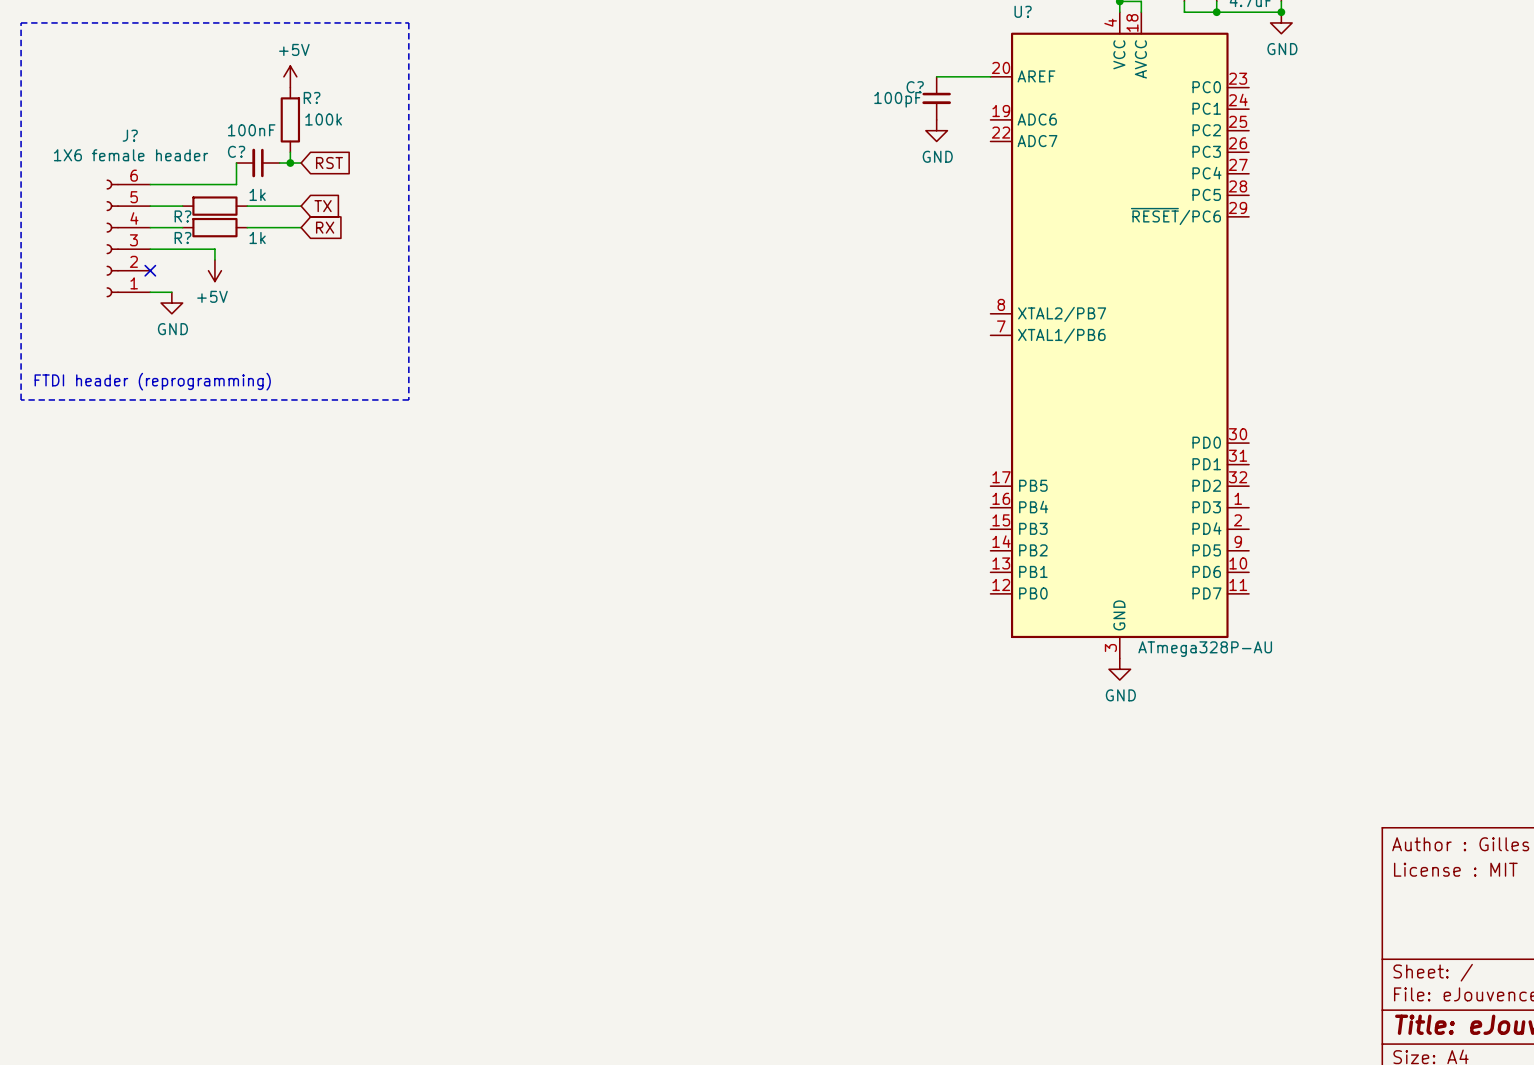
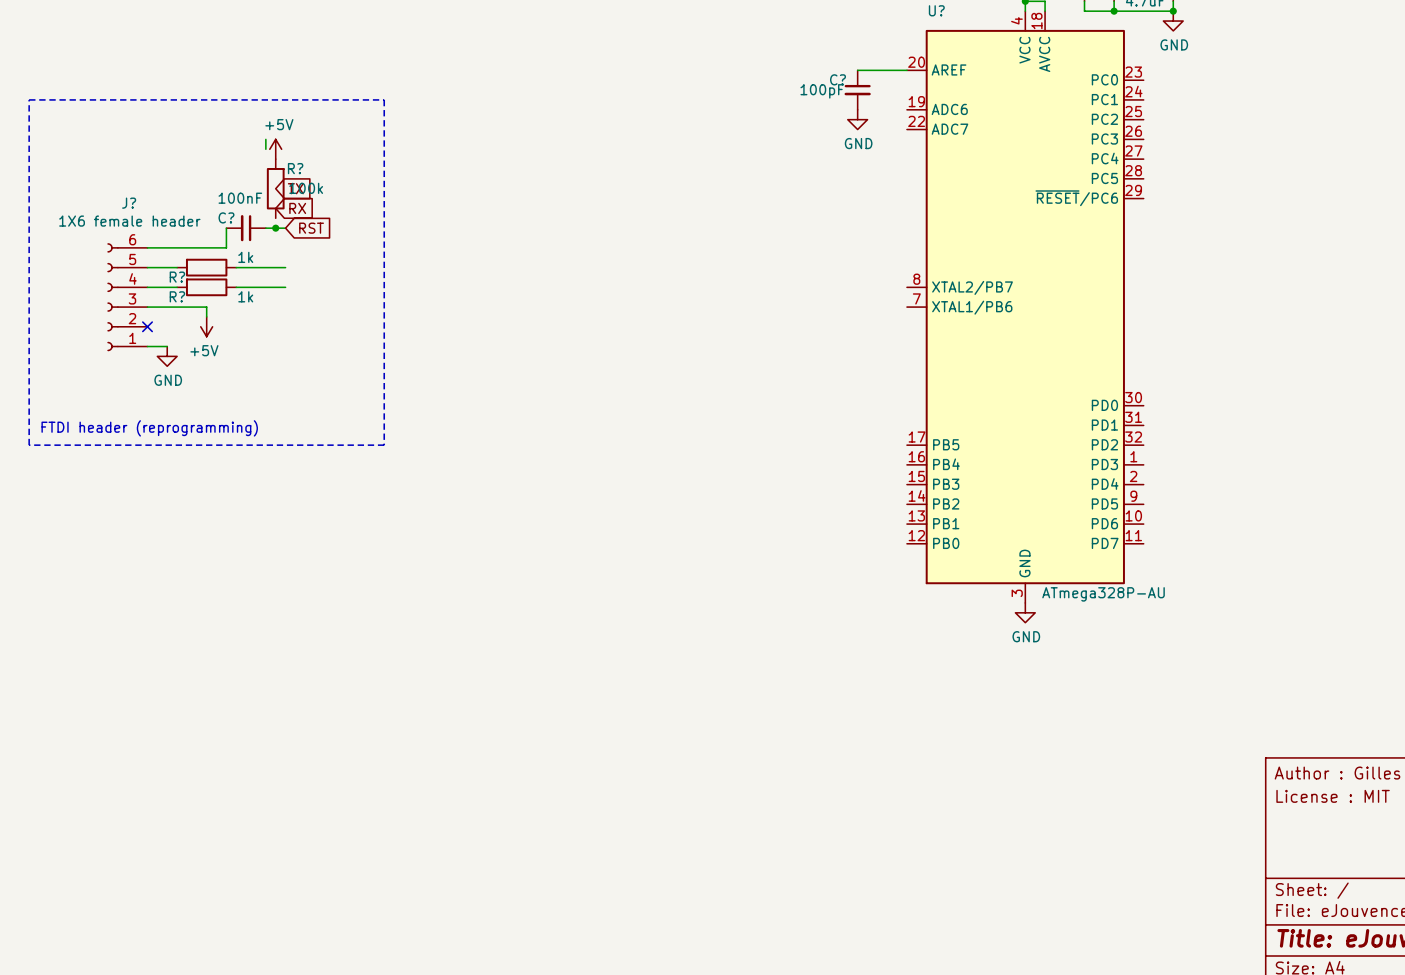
line: (21, 22) (21, 399) (408, 399) (408, 22) (21, 22) -> (29, 99) (29, 445) (384, 445) (384, 99) (29, 99)
power symbol: +5V (290, 76) -> none
R? position: (290, 119) -> (275, 188)
wire: (236, 163) (236, 184) (150, 184) -> (226, 228) (226, 247) (147, 247)
C? position: (258, 163) -> (246, 228)
wire: (279, 163) (301, 163) -> (265, 228) (285, 228)
junction: (290, 163) -> none
power symbol: none -> +5V (275, 149)
global label position: RST (329, 163) -> RST (311, 228)
wire: (150, 206) (182, 206) -> none
R?: 1k (214, 206) -> none
wire: (247, 206) (301, 206) -> (236, 267) (285, 267)
wire: (150, 227) (182, 227) -> (147, 287) (177, 287)
R?: 1k (214, 227) -> none
wire: (247, 227) (301, 227) -> (236, 287) (285, 287)
J? position: (128, 238) -> (127, 297)
wire: (150, 249) (214, 249) (214, 259) -> (147, 307) (206, 307) (206, 316)
junction: none -> (275, 228)
no-connect mark: (150, 270) -> none
power symbol: +5V (214, 270) -> none
wire: none -> (157, 267) (177, 267)
R?: none -> 1k (206, 267)
power symbol position: GND (171, 303) -> GND (167, 356)
R?: none -> 1k (206, 287)
no-connect mark: none -> (147, 326)
power symbol: none -> +5V (206, 326)
text position: FTDI header (reprogramming) (152, 381) -> FTDI header (reprogramming) (149, 428)

